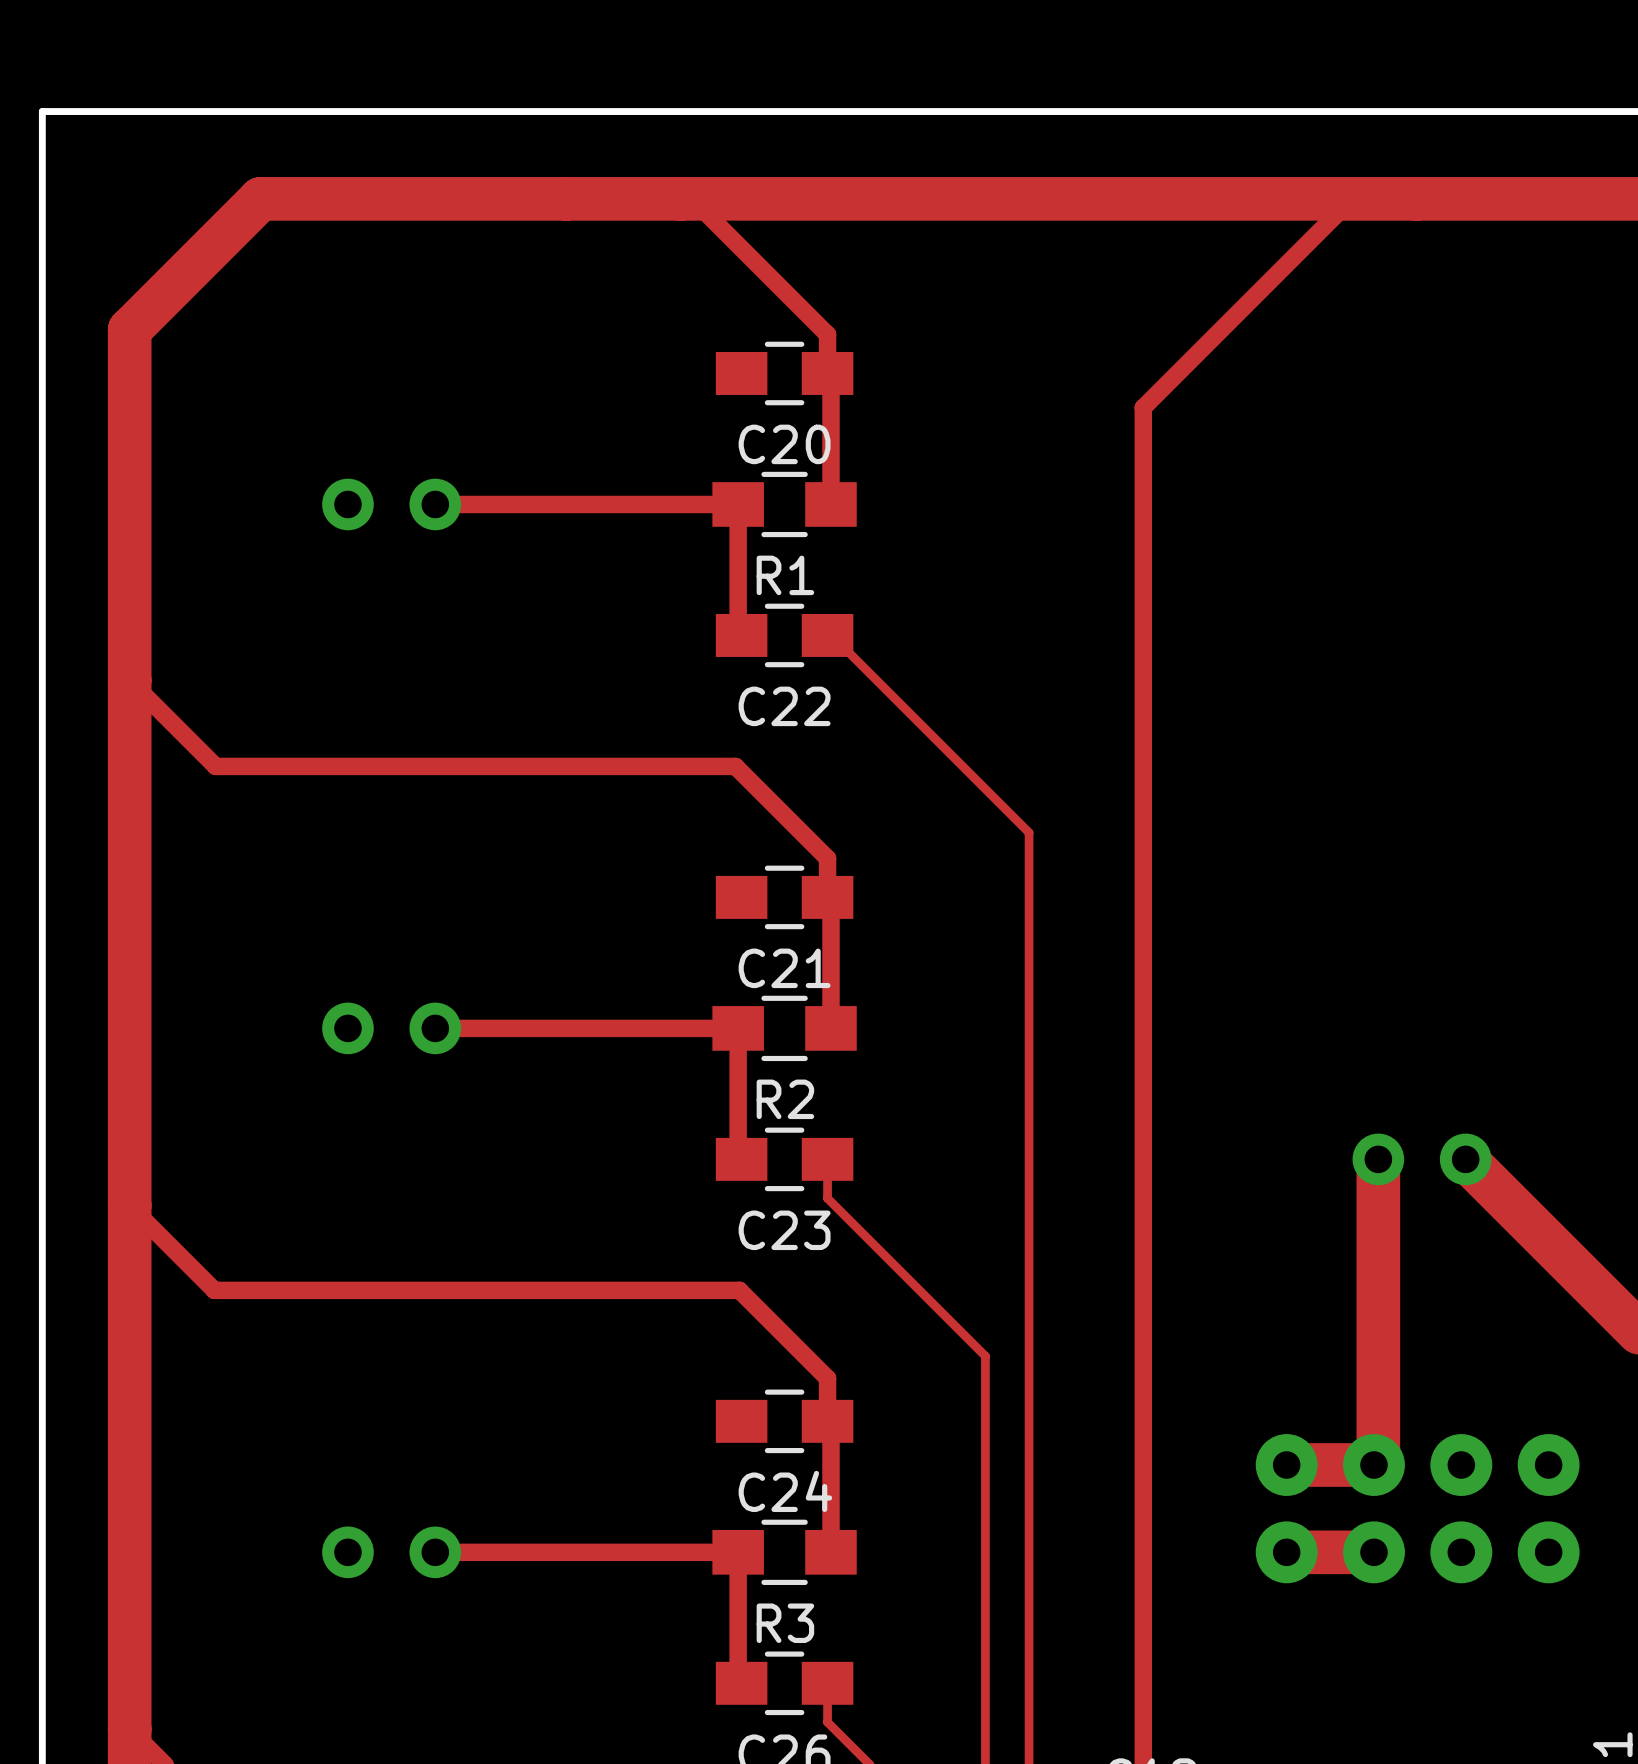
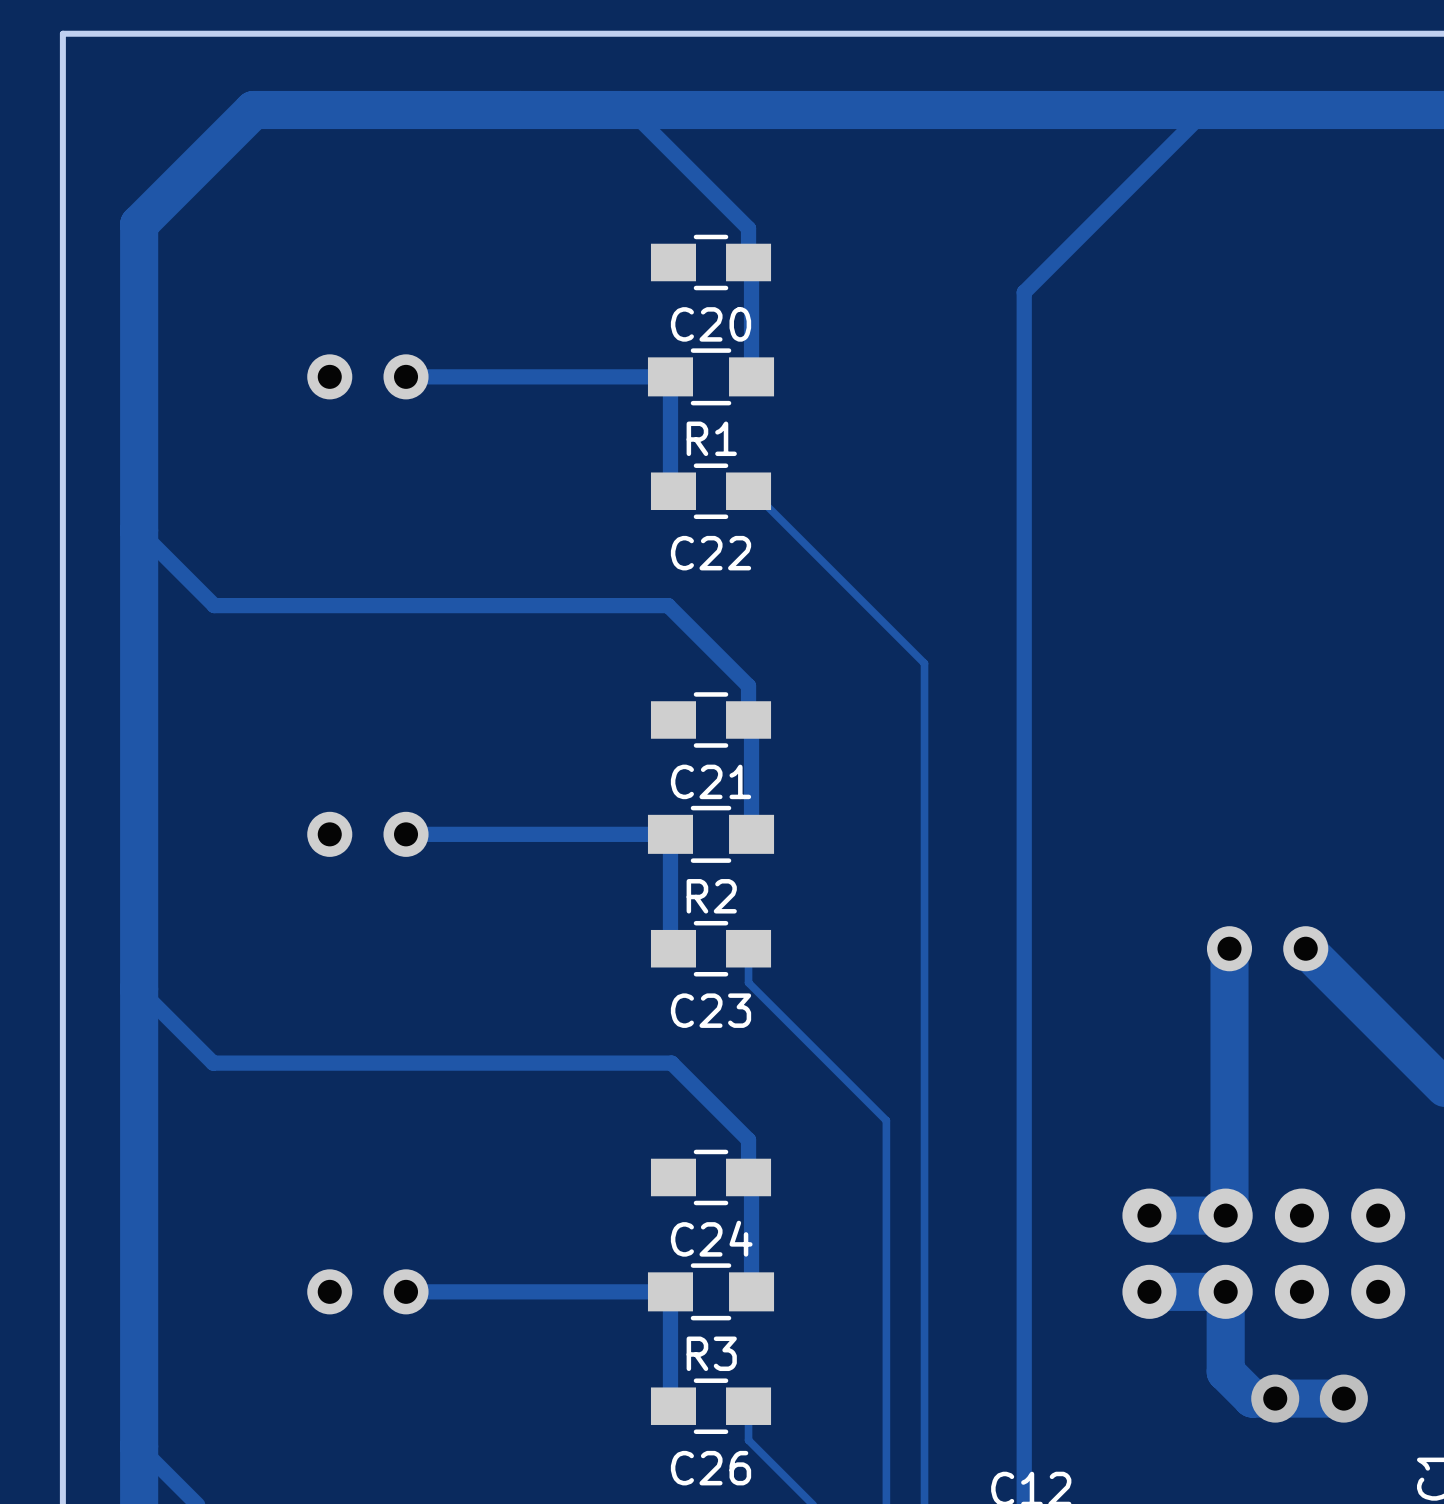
track: none -> (1225, 1291) (1225, 1371) (1252, 1398) (1343, 1398)
via: none -> (1275, 1398)
via: none -> (1343, 1398)

